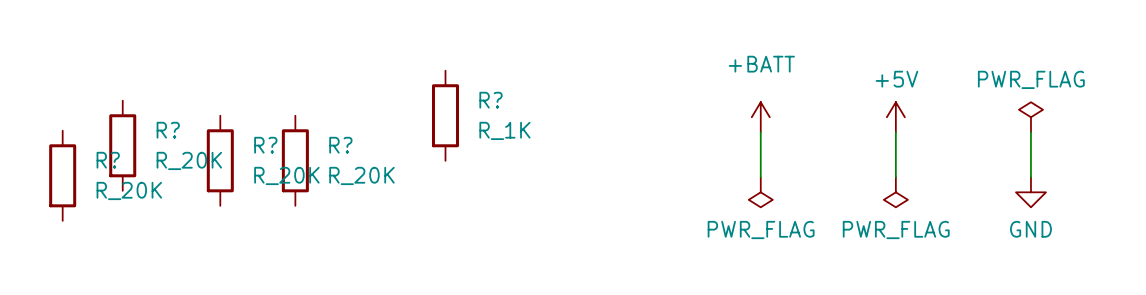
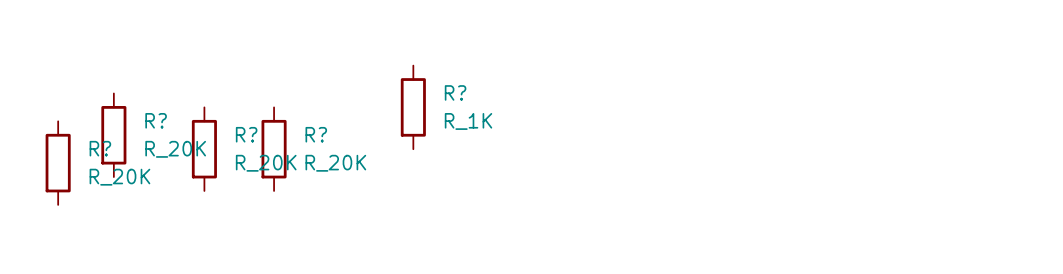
power symbol: +BATT (760, 117) -> none
power symbol: +5V (895, 117) -> none
power symbol: PWR_FLAG (1030, 117) -> none
wire: (760, 132) (760, 177) -> none
wire: (895, 132) (895, 177) -> none
wire: (1030, 132) (1030, 177) -> none
power symbol: PWR_FLAG (760, 192) -> none
power symbol: PWR_FLAG (895, 192) -> none
power symbol: GND (1030, 192) -> none

